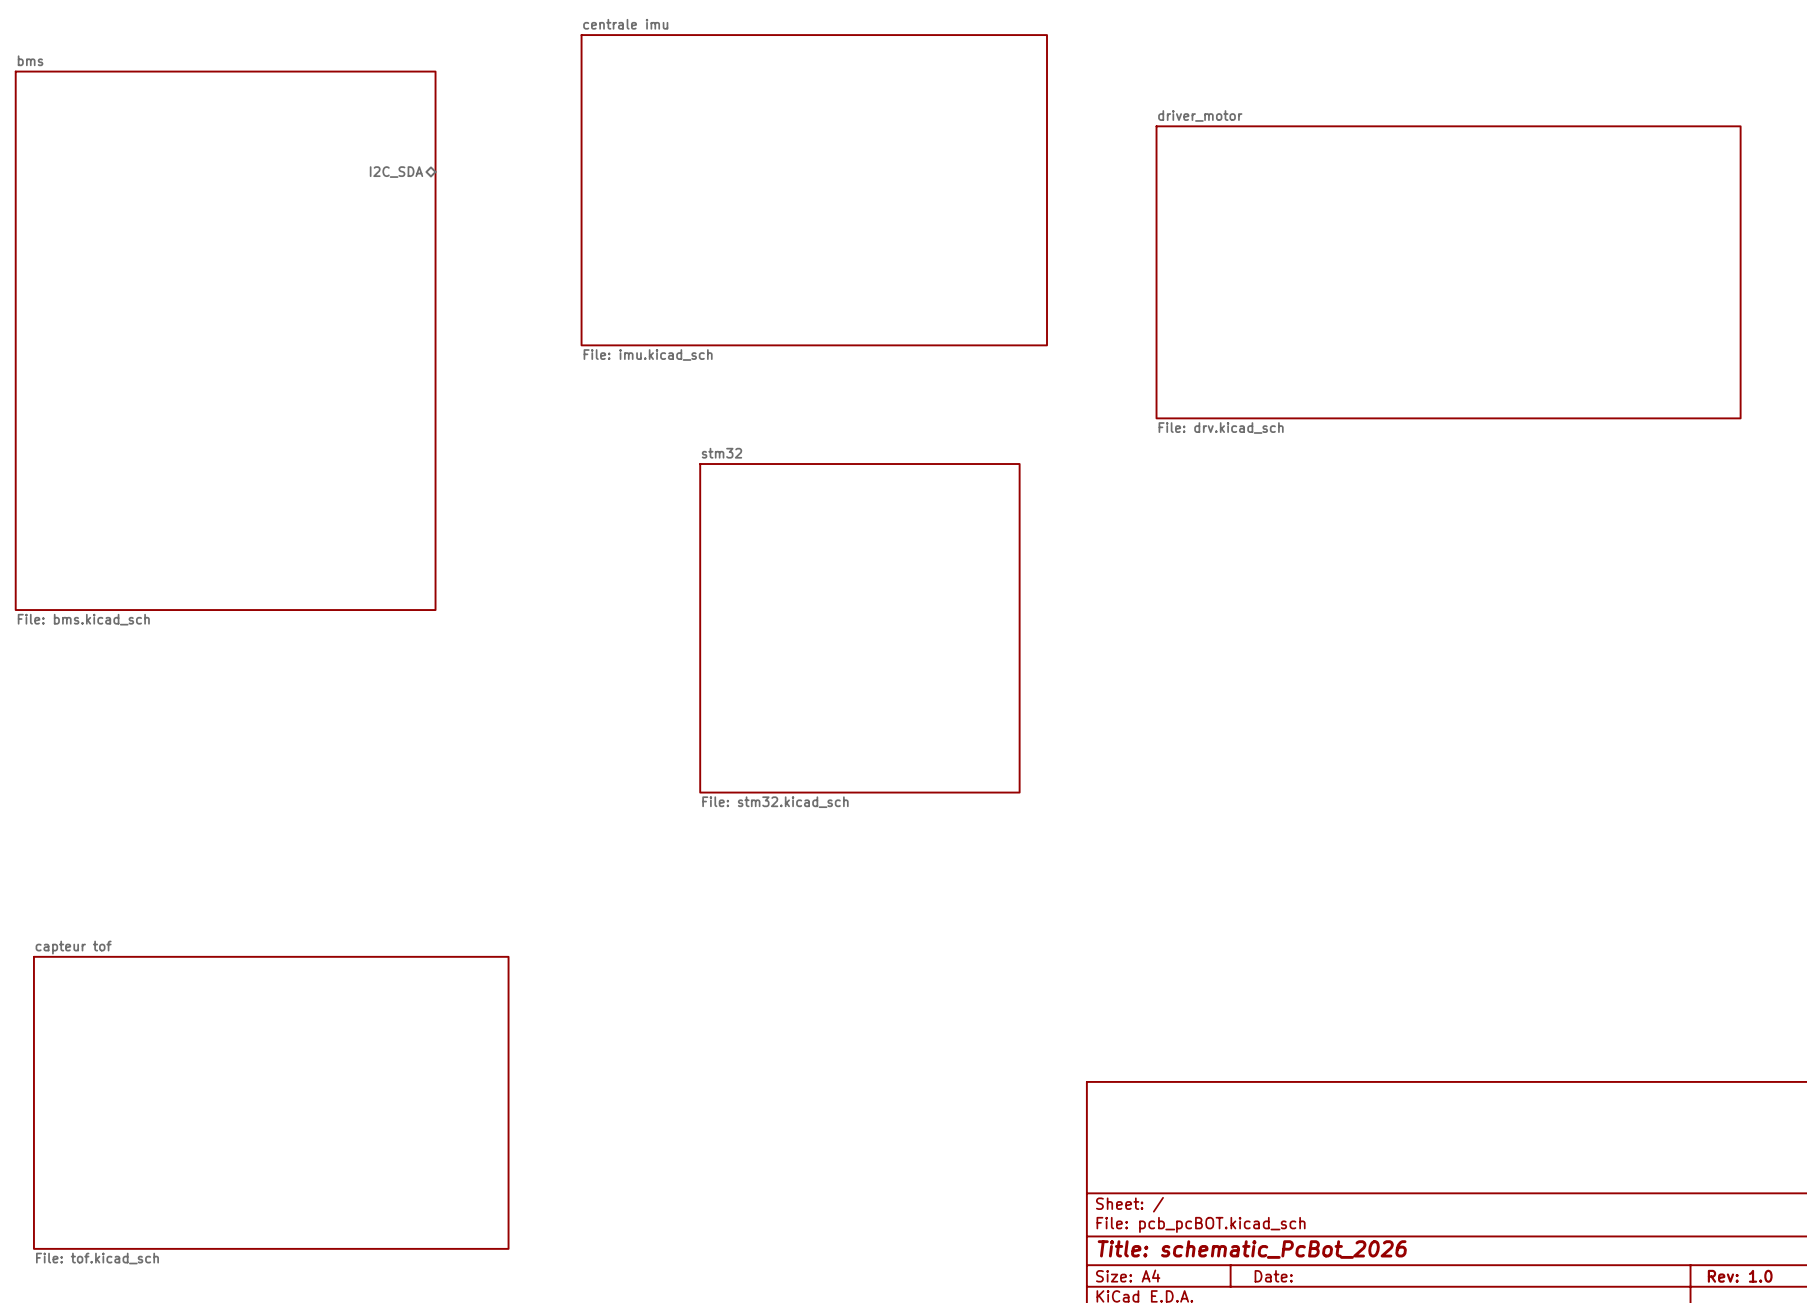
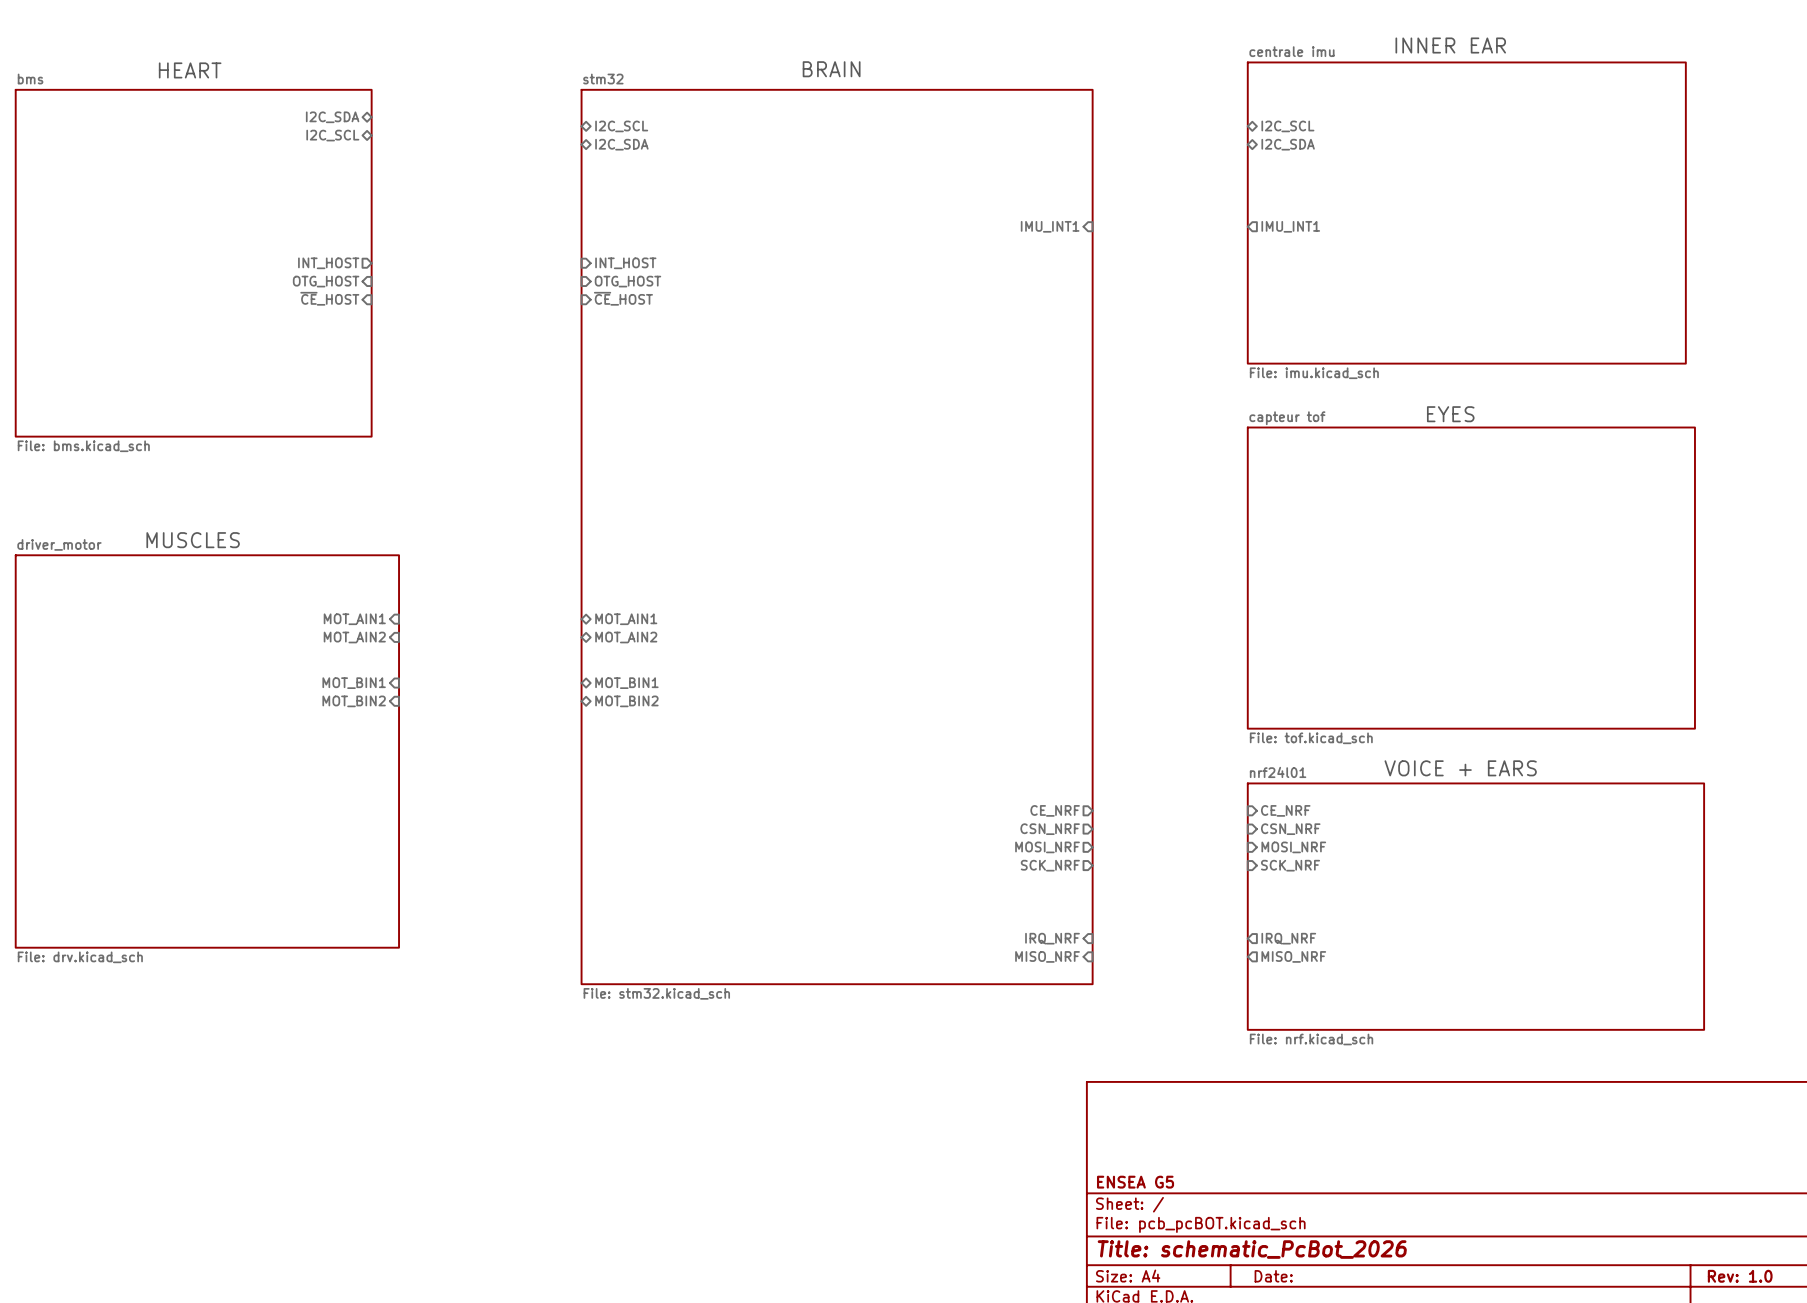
text: none -> INNER EAR (1450, 45)
text: none -> BRAIN (831, 69)
text: none -> HEART (190, 70)
sheet pin: none -> I2C_SCL (621, 126)
sheet pin: none -> I2C_SCL (1287, 126)
sheet pin: none -> I2C_SCL (332, 135)
sheet pin: none -> I2C_SDA (621, 144)
sheet pin: none -> I2C_SDA (1288, 144)
sheet pin position: I2C_SDA (396, 172) -> I2C_SDA (332, 117)
sheet centrale imu: File: imu.kicad_sch (814, 190) -> none
sheet centrale imu: none -> File: imu.kicad_sch (1466, 213)
sheet pin: none -> IMU_INT1 (1050, 226)
sheet pin: none -> IMU_INT1 (1290, 226)
sheet bms: none -> File: bms.kicad_sch (193, 263)
sheet pin: none -> INT_HOST (328, 263)
sheet pin: none -> INT_HOST (625, 263)
sheet driver_motor: File: drv.kicad_sch (1448, 272) -> none
sheet pin: none -> OTG_HOST (326, 281)
sheet pin: none -> OTG_HOST (627, 281)
sheet pin: none -> ~{CE}_HOST (329, 298)
sheet pin: none -> ~{CE}_HOST (623, 298)
sheet bms: File: bms.kicad_sch (225, 340) -> none
text: none -> EYES (1450, 414)
sheet stm32 name position: stm32 (721, 453) -> stm32 (603, 79)
sheet stm32 shape: [699, 463, 1021, 794] -> [581, 89, 1094, 985]
text: none -> MUSCLES (193, 540)
sheet capteur tof: none -> File: tof.kicad_sch (1471, 578)
sheet pin: none -> MOT_AIN1 (354, 619)
sheet pin: none -> MOT_AIN1 (626, 619)
sheet pin: none -> MOT_AIN2 (354, 637)
sheet pin: none -> MOT_AIN2 (626, 637)
sheet pin: none -> MOT_BIN1 (354, 683)
sheet pin: none -> MOT_BIN1 (626, 683)
sheet pin: none -> MOT_BIN2 (354, 701)
sheet pin: none -> MOT_BIN2 (626, 701)
sheet driver_motor: none -> File: drv.kicad_sch (207, 751)
text: none -> VOICE + EARS (1460, 768)
sheet stm32 value position: File: stm32.kicad_sch (775, 802) -> File: stm32.kicad_sch (656, 993)
sheet pin: none -> CE_NRF (1055, 810)
sheet pin: none -> CE_NRF (1285, 810)
sheet pin: none -> CSN_NRF (1050, 829)
sheet pin: none -> CSN_NRF (1290, 829)
sheet pin: none -> MOSI_NRF (1047, 847)
sheet pin: none -> MOSI_NRF (1293, 847)
sheet pin: none -> SCK_NRF (1050, 865)
sheet pin: none -> SCK_NRF (1290, 865)
sheet nrf24l01: none -> File: nrf.kicad_sch (1475, 906)
sheet pin: none -> IRQ_NRF (1052, 938)
sheet pin: none -> IRQ_NRF (1288, 938)
sheet pin: none -> MISO_NRF (1047, 956)
sheet pin: none -> MISO_NRF (1293, 956)
sheet capteur tof: File: tof.kicad_sch (271, 1102) -> none
title block: none -> ENSEA G5 (1135, 1182)

